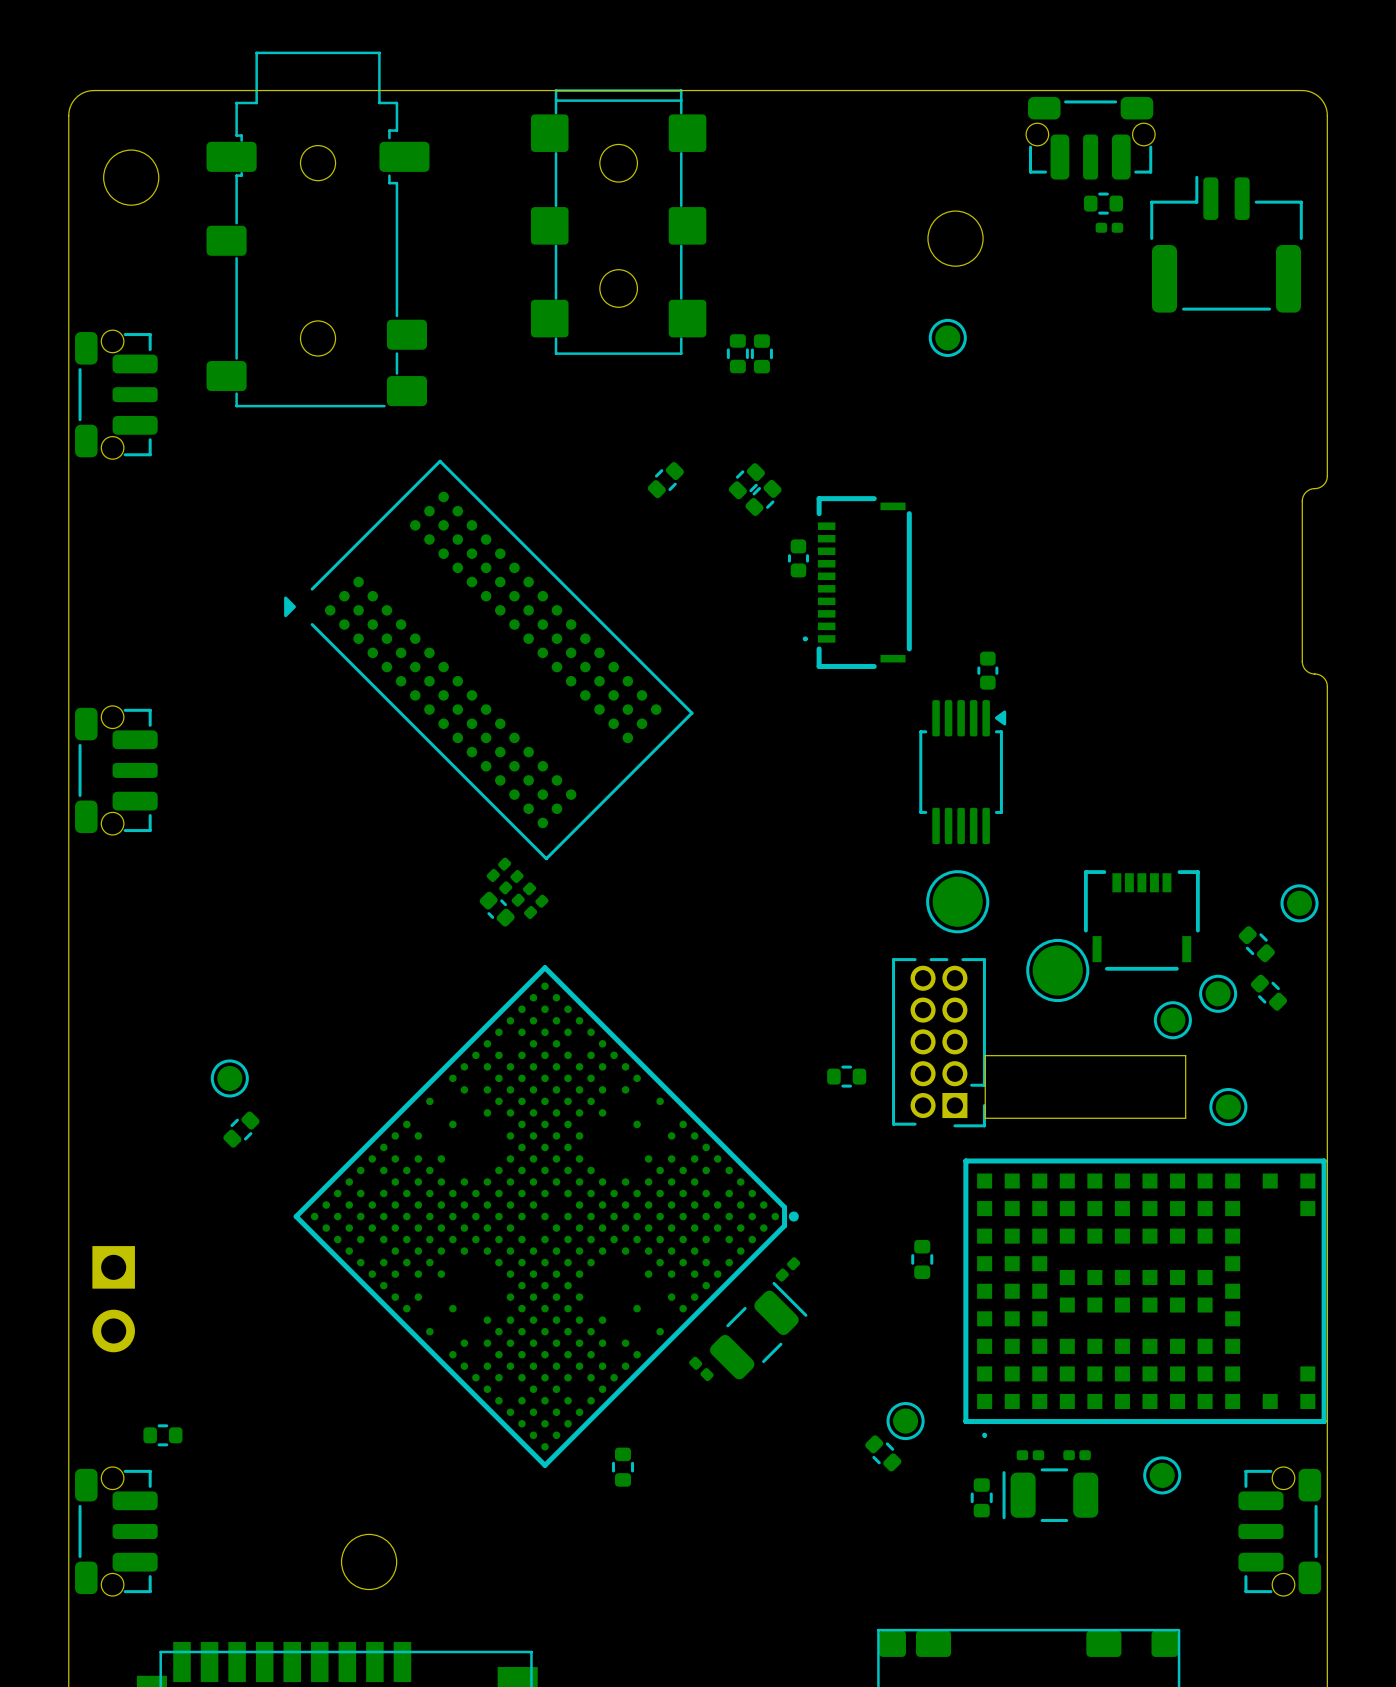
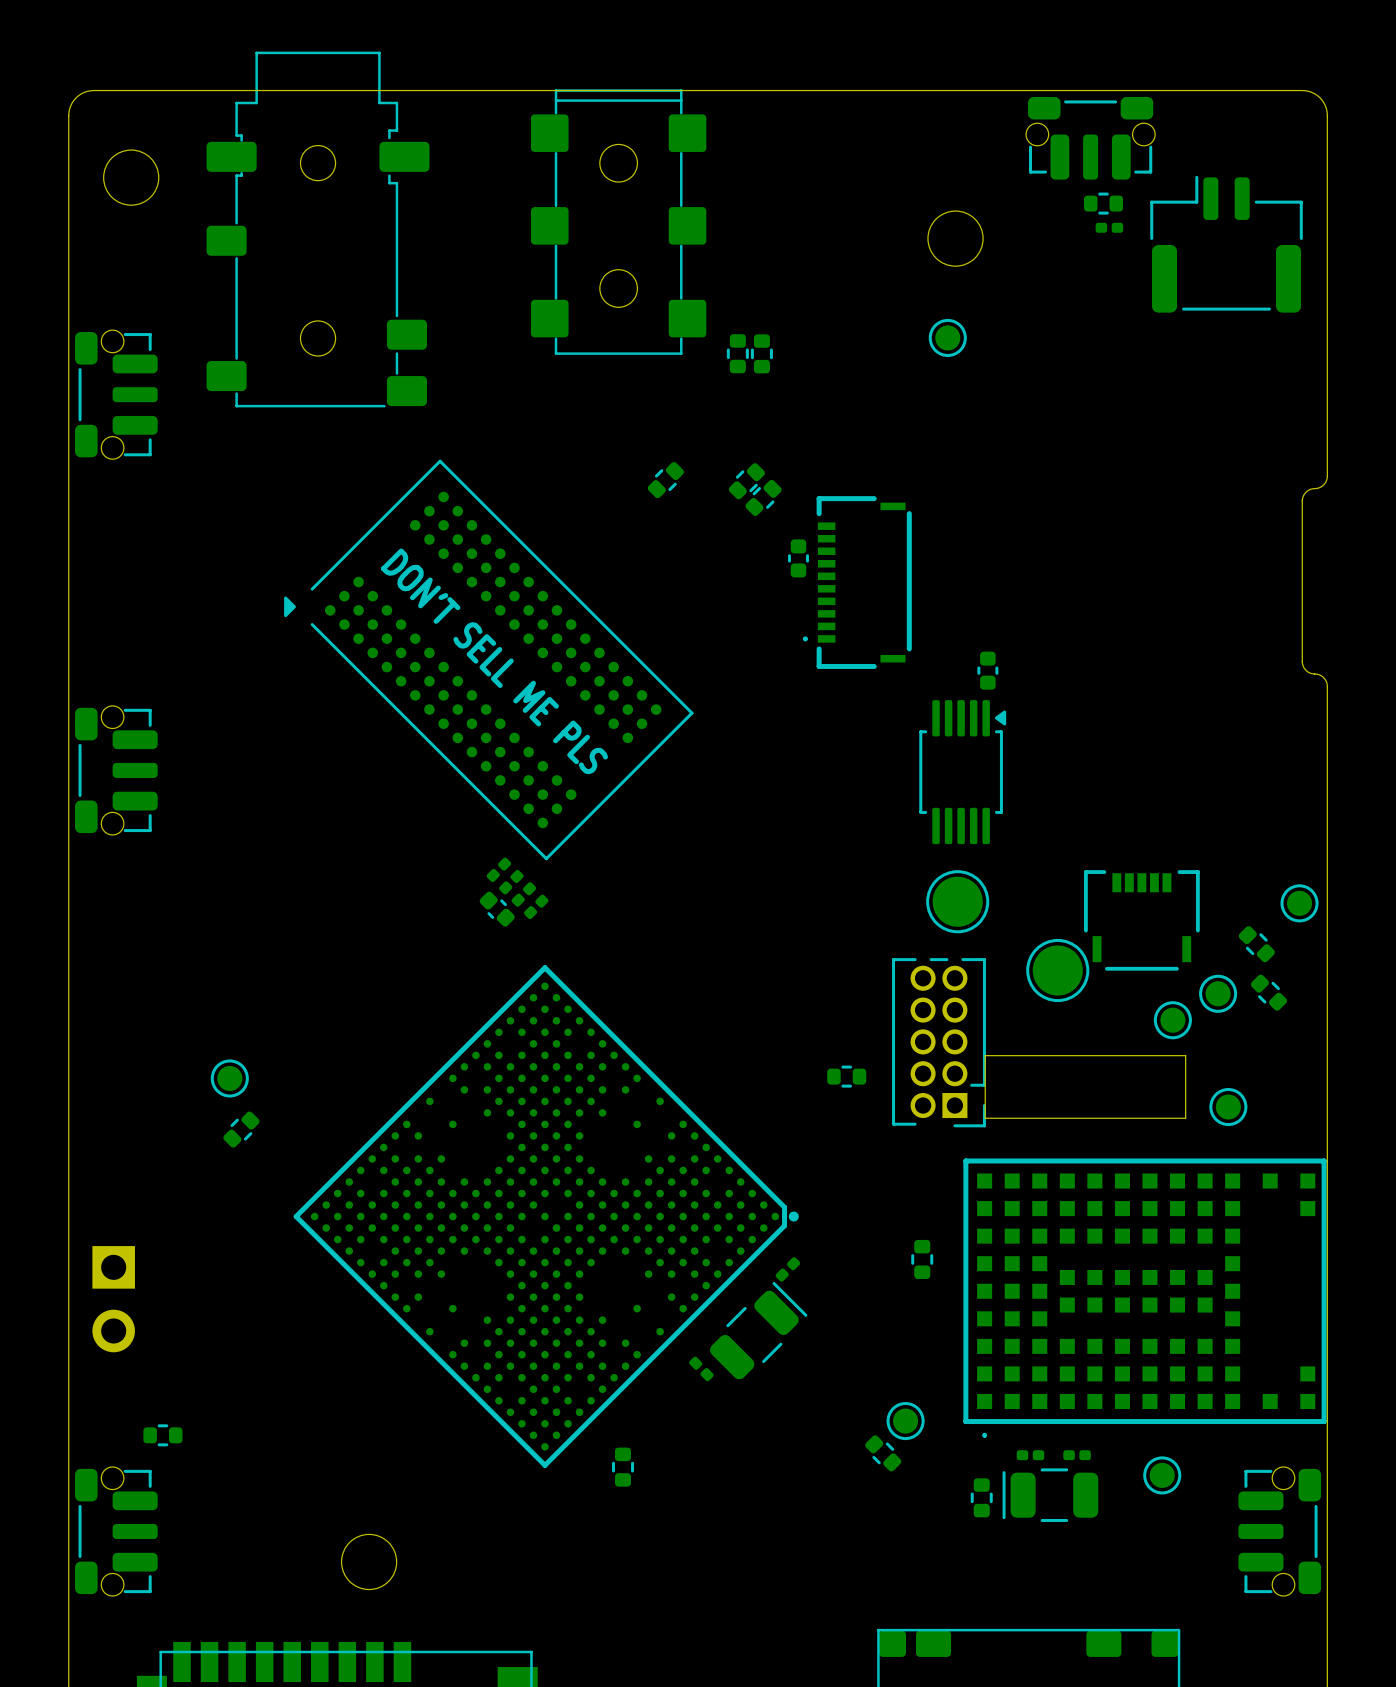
text: none -> DON'T SELL ME PLS (494, 661)

